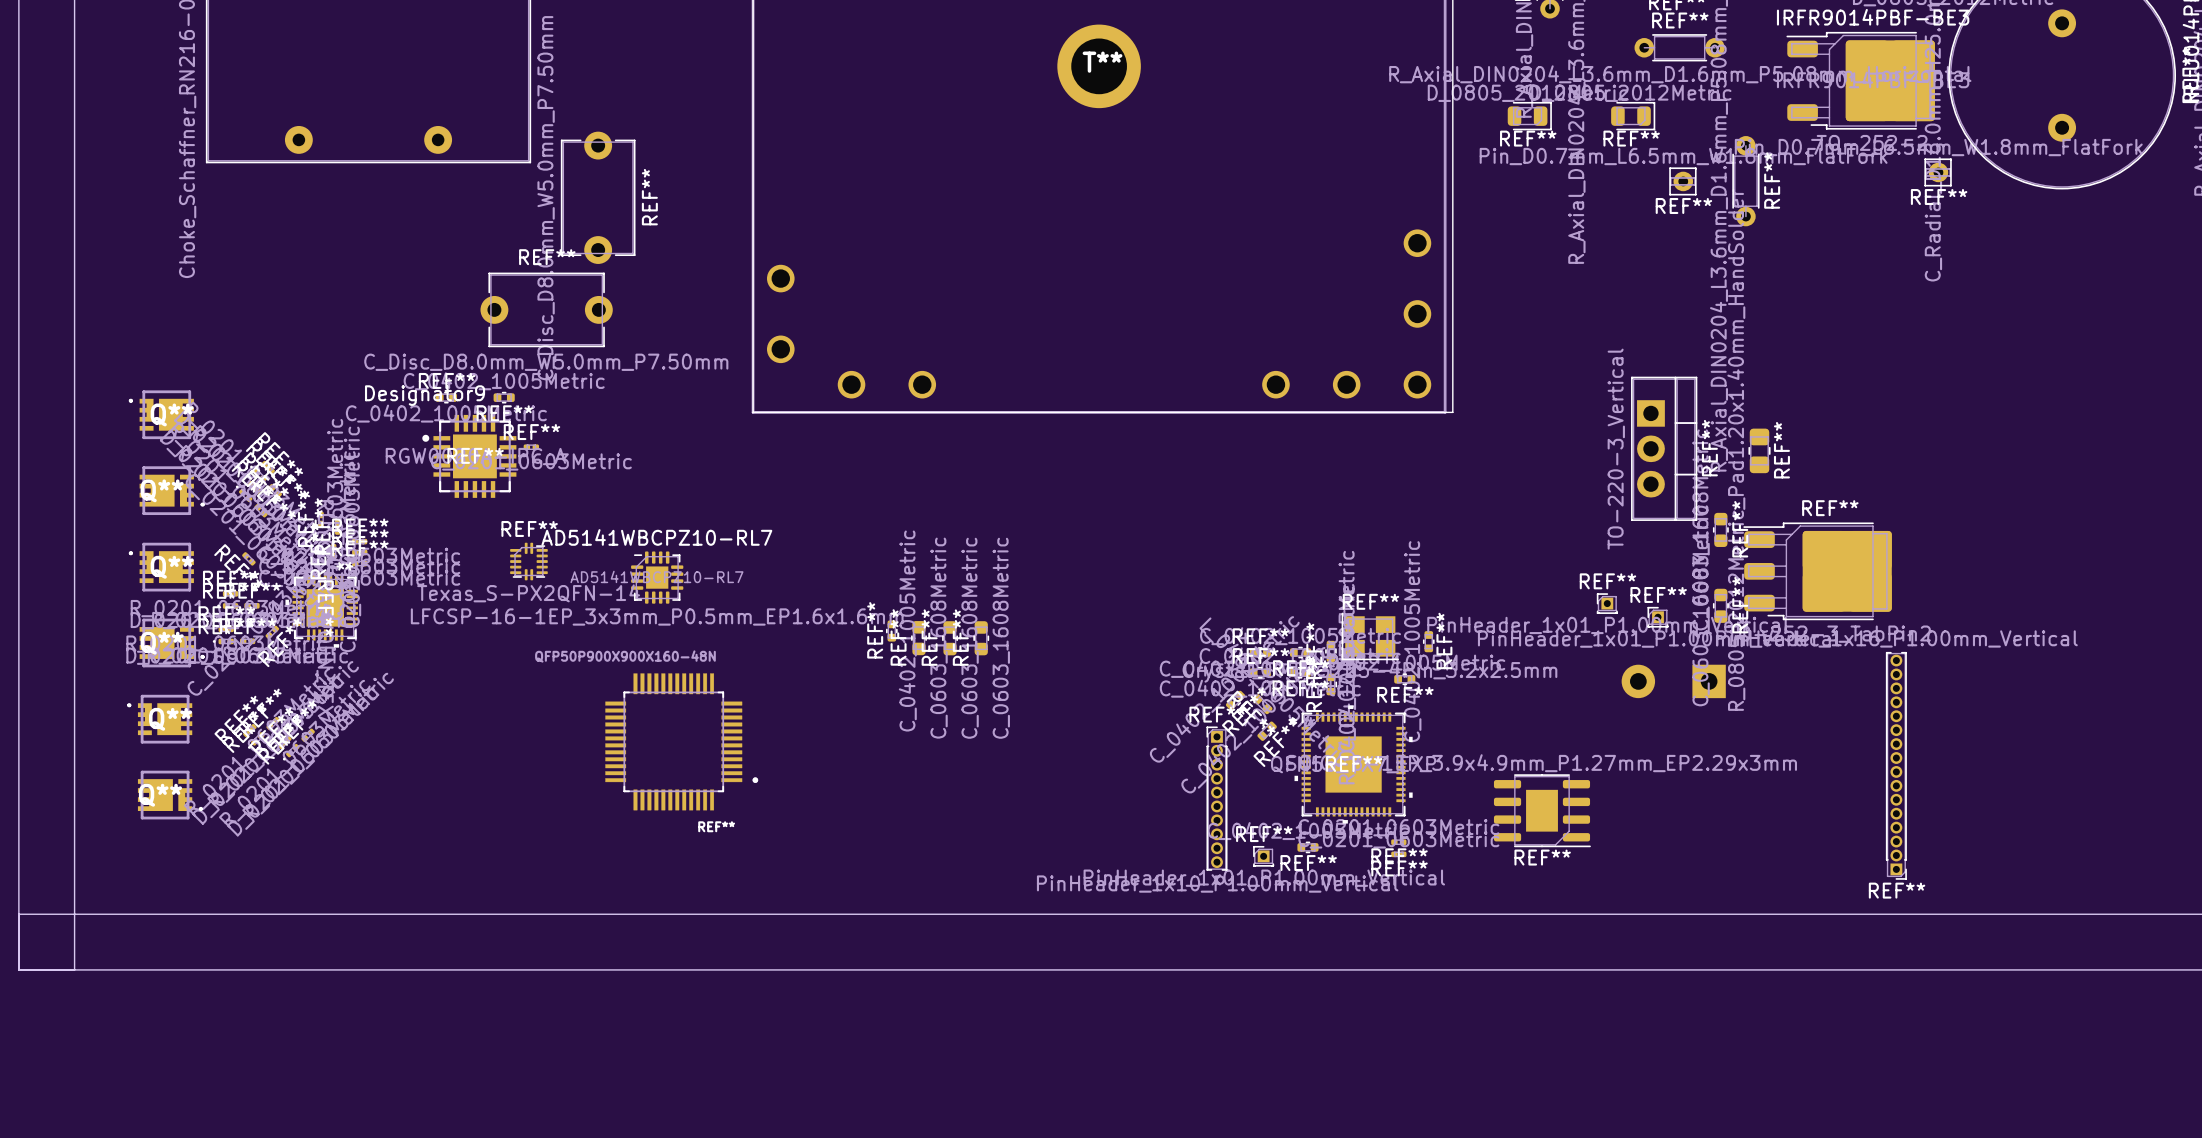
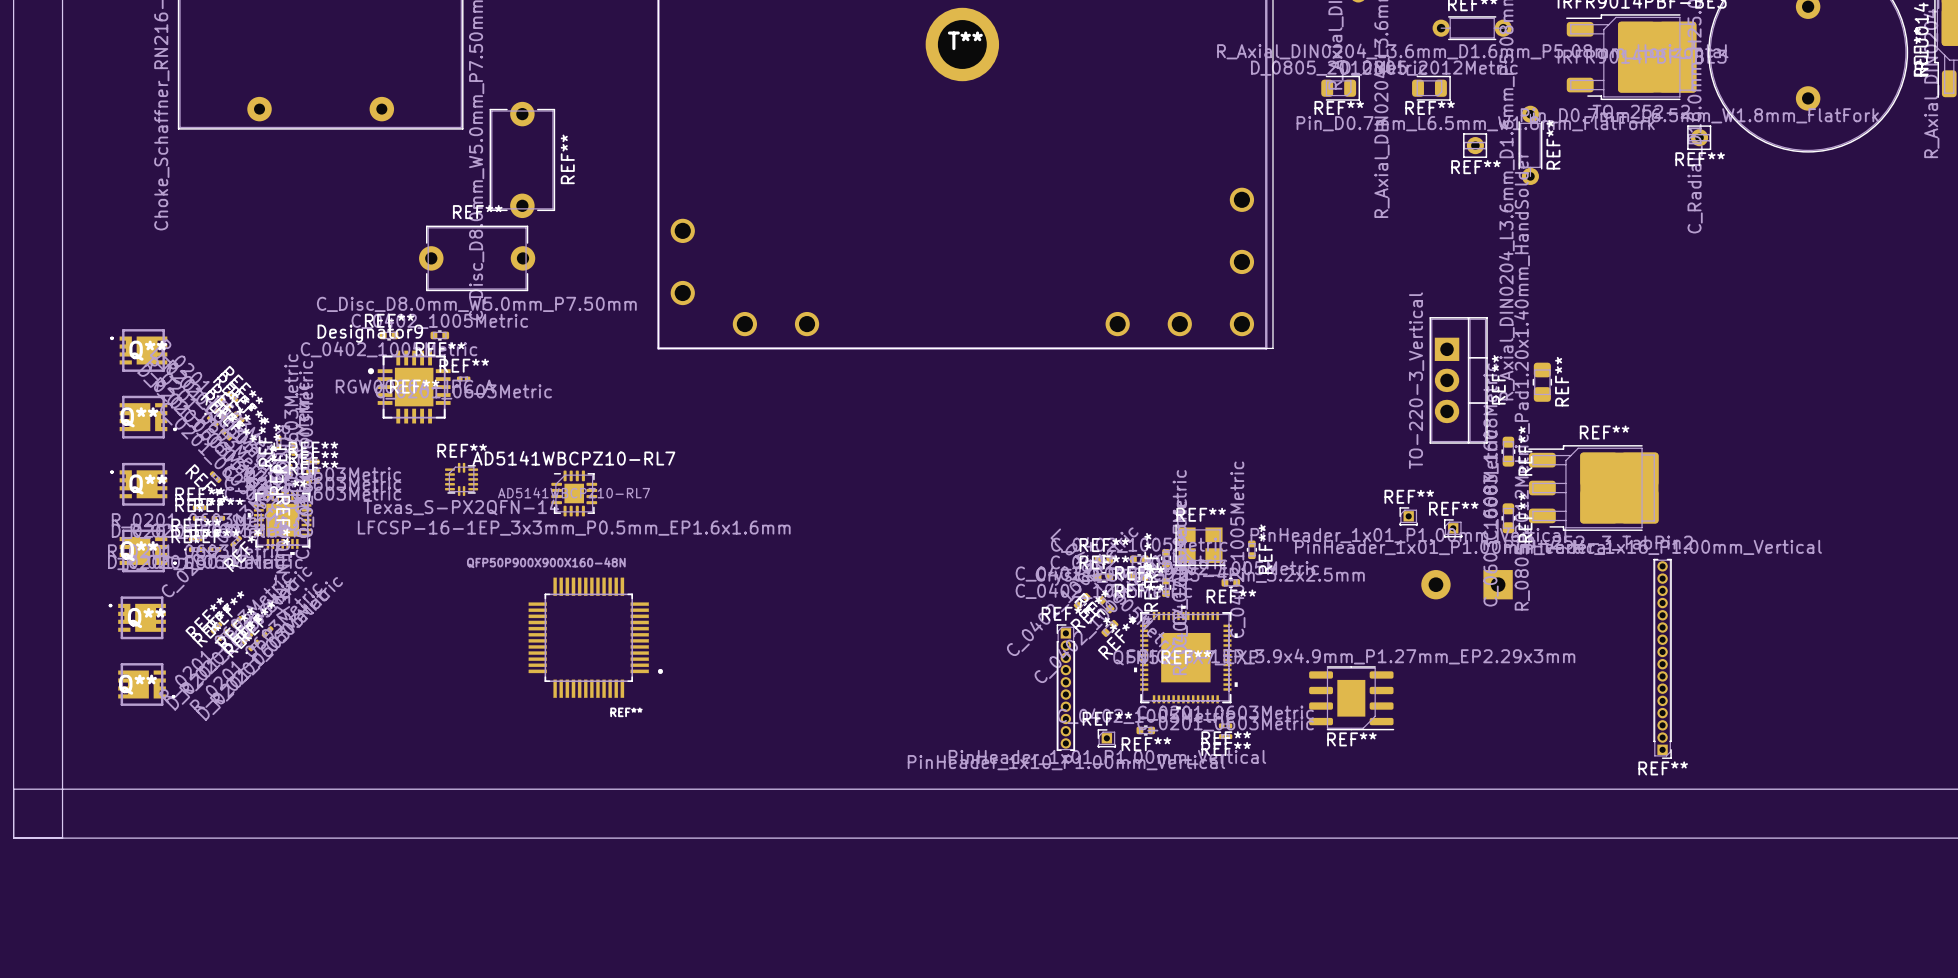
REF**: C_0402_1005Metric (891, 631) -> none
REF**: C_0603_1608Metric (918, 638) -> none
REF**: C_0603_1608Metric (950, 638) -> none
REF**: C_0603_1608Metric (981, 638) -> none

